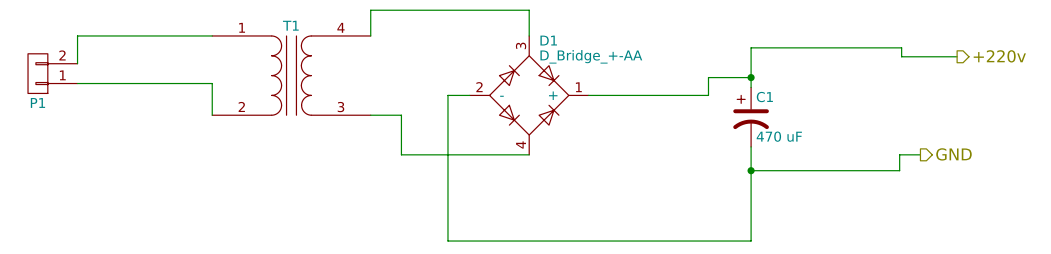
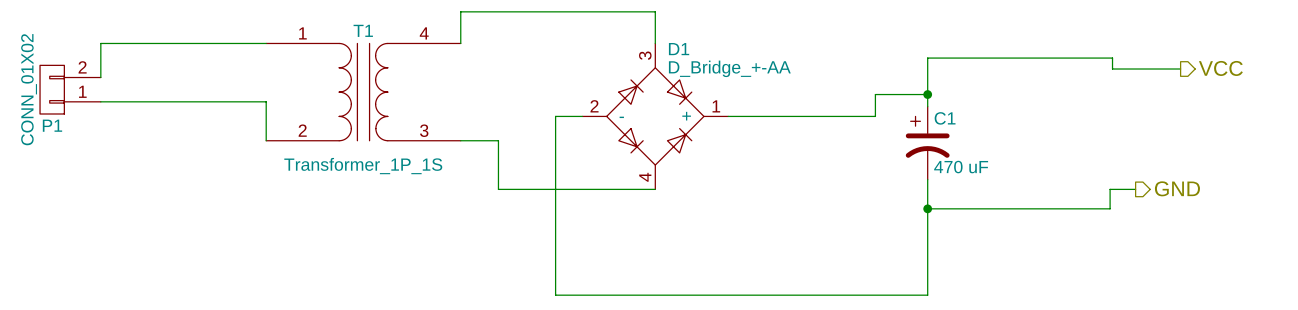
hierarchical label: +220v (999, 56) -> VCC (1220, 68)
P1 value: none -> CONN_01X02 (29, 89)
T1 value: none -> Transformer_1P_1S (363, 166)

